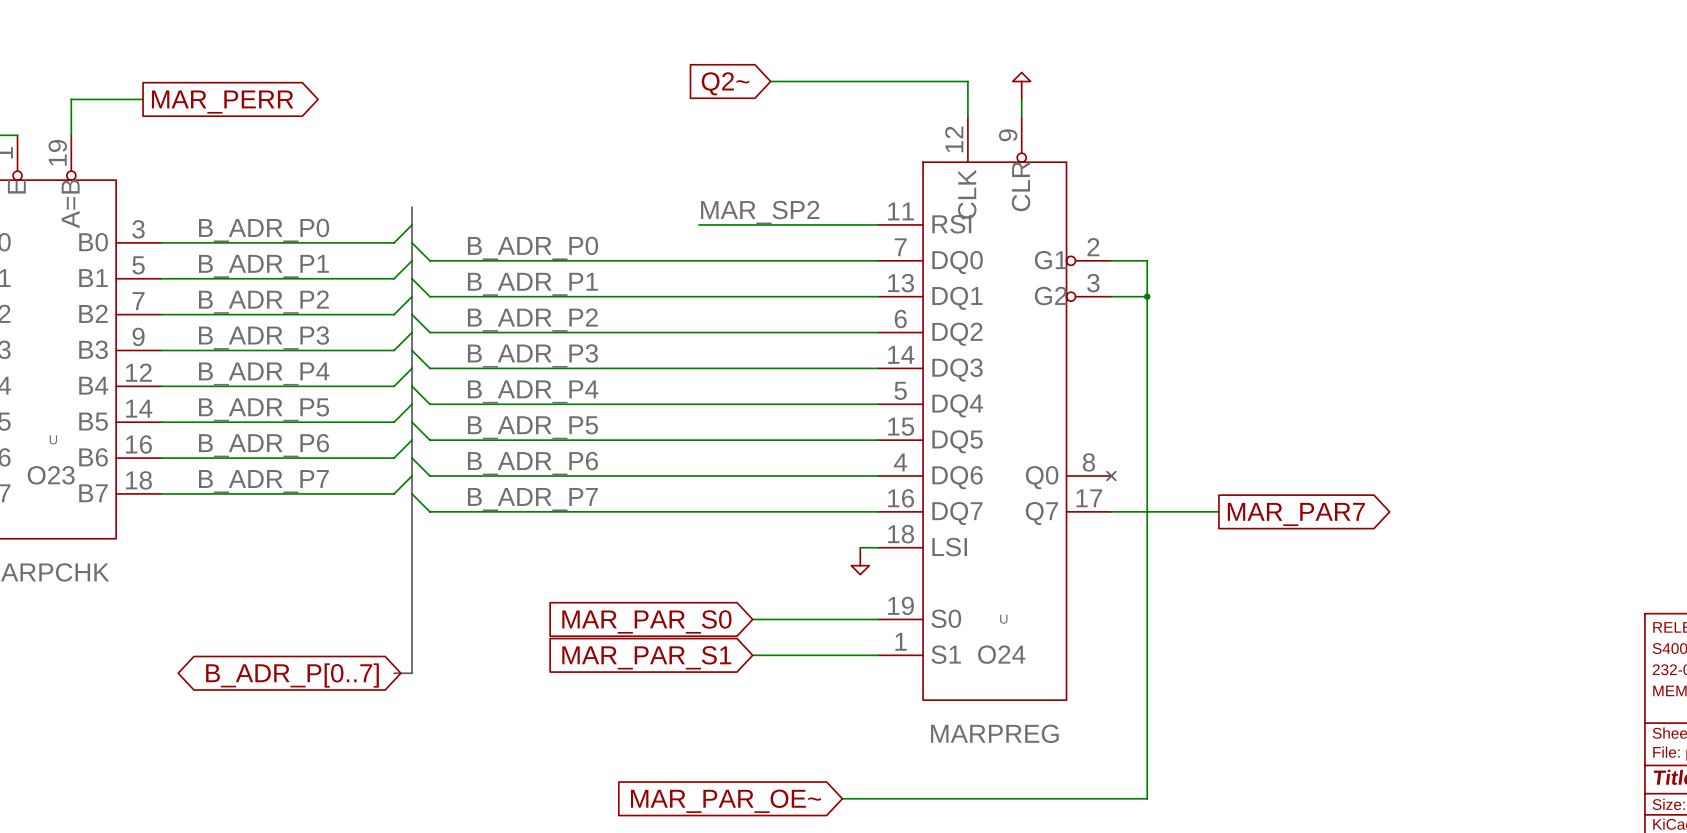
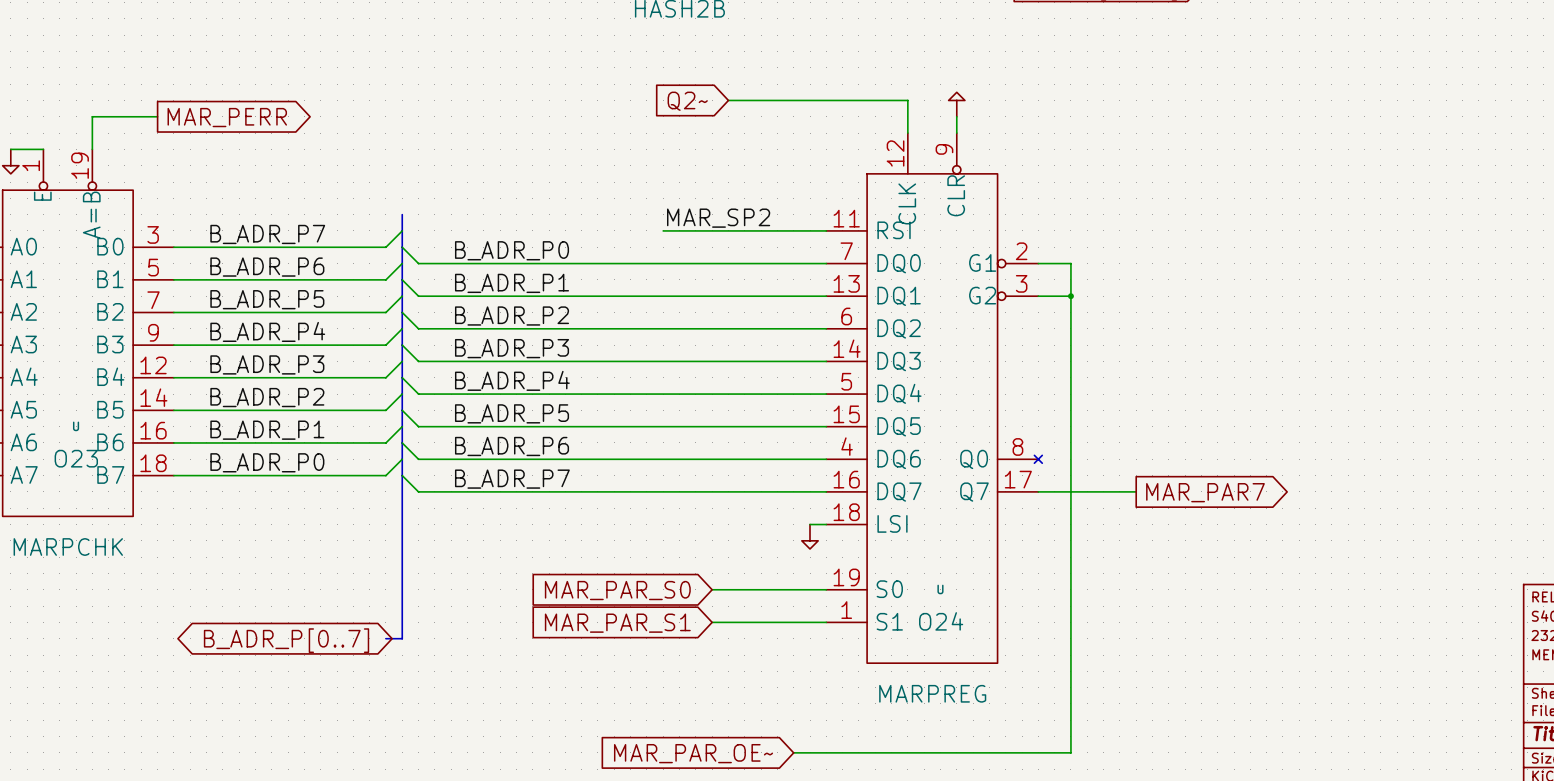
label: B_ADR_P0 (264, 230) -> B_ADR_P7 (267, 234)
label: B_ADR_P1 (263, 266) -> B_ADR_P6 (267, 267)
label: B_ADR_P2 (263, 302) -> B_ADR_P5 (267, 299)
label: B_ADR_P3 (263, 338) -> B_ADR_P4 (267, 331)
label: B_ADR_P4 (264, 374) -> B_ADR_P3 (267, 364)
label: B_ADR_P5 (264, 409) -> B_ADR_P2 (267, 397)
label: B_ADR_P6 (263, 445) -> B_ADR_P1 (267, 430)
label: B_ADR_P7 (263, 481) -> B_ADR_P0 (267, 462)

